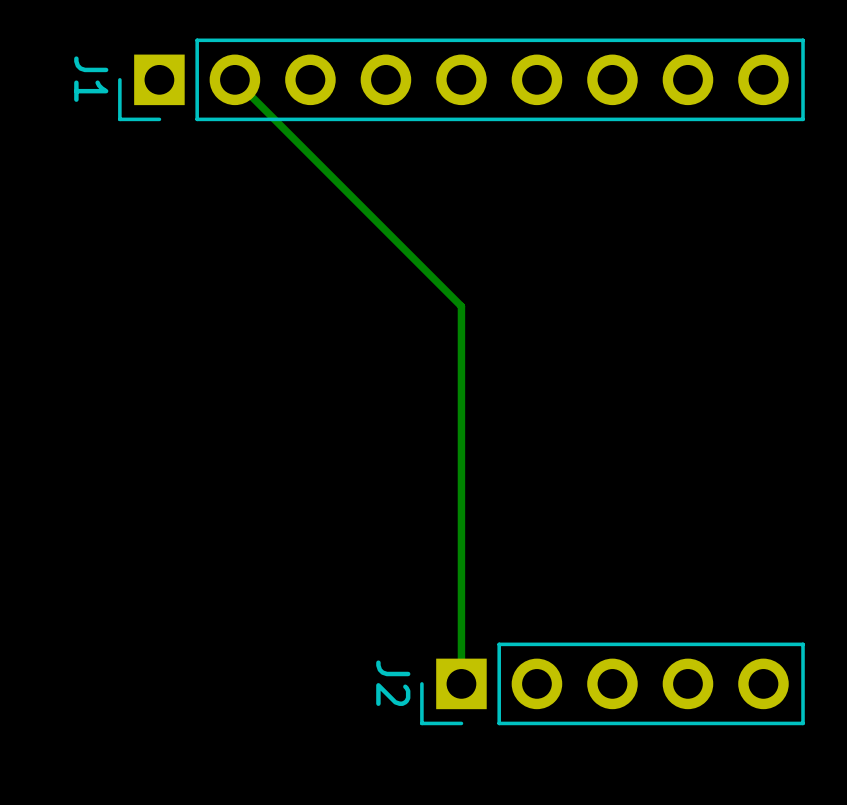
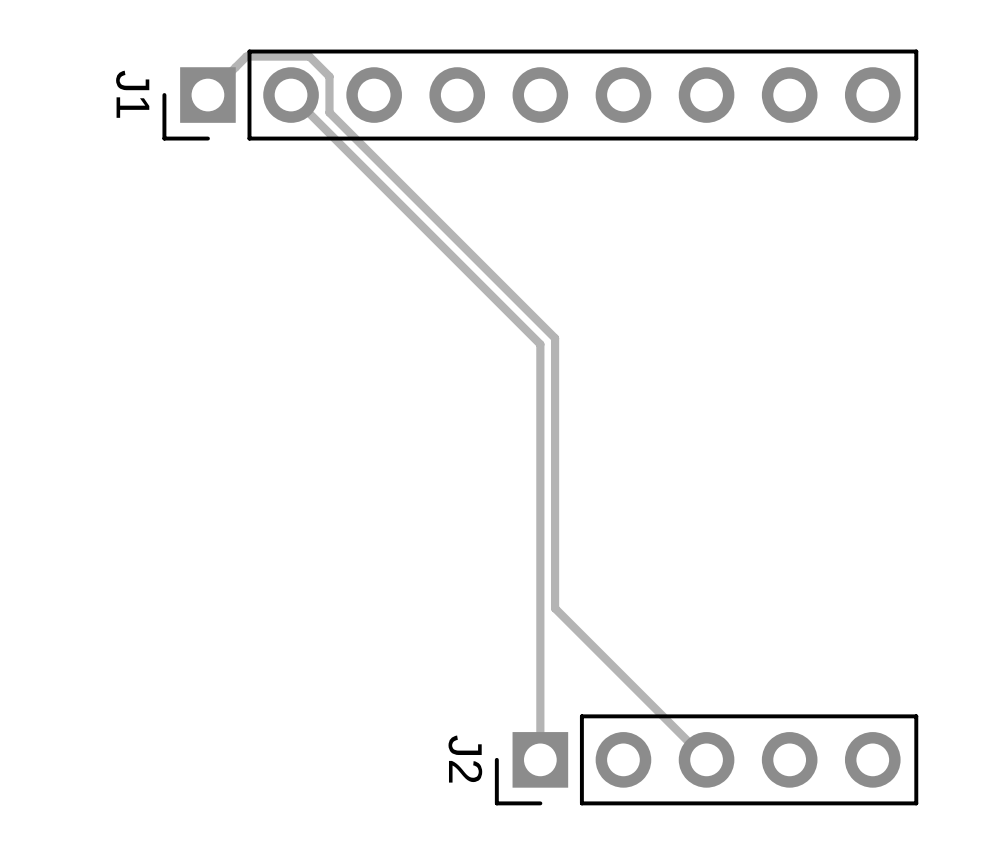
track: none -> (207, 95) (246, 56) (309, 56) (329, 76) (329, 112) (555, 338) (555, 608) (706, 759)

